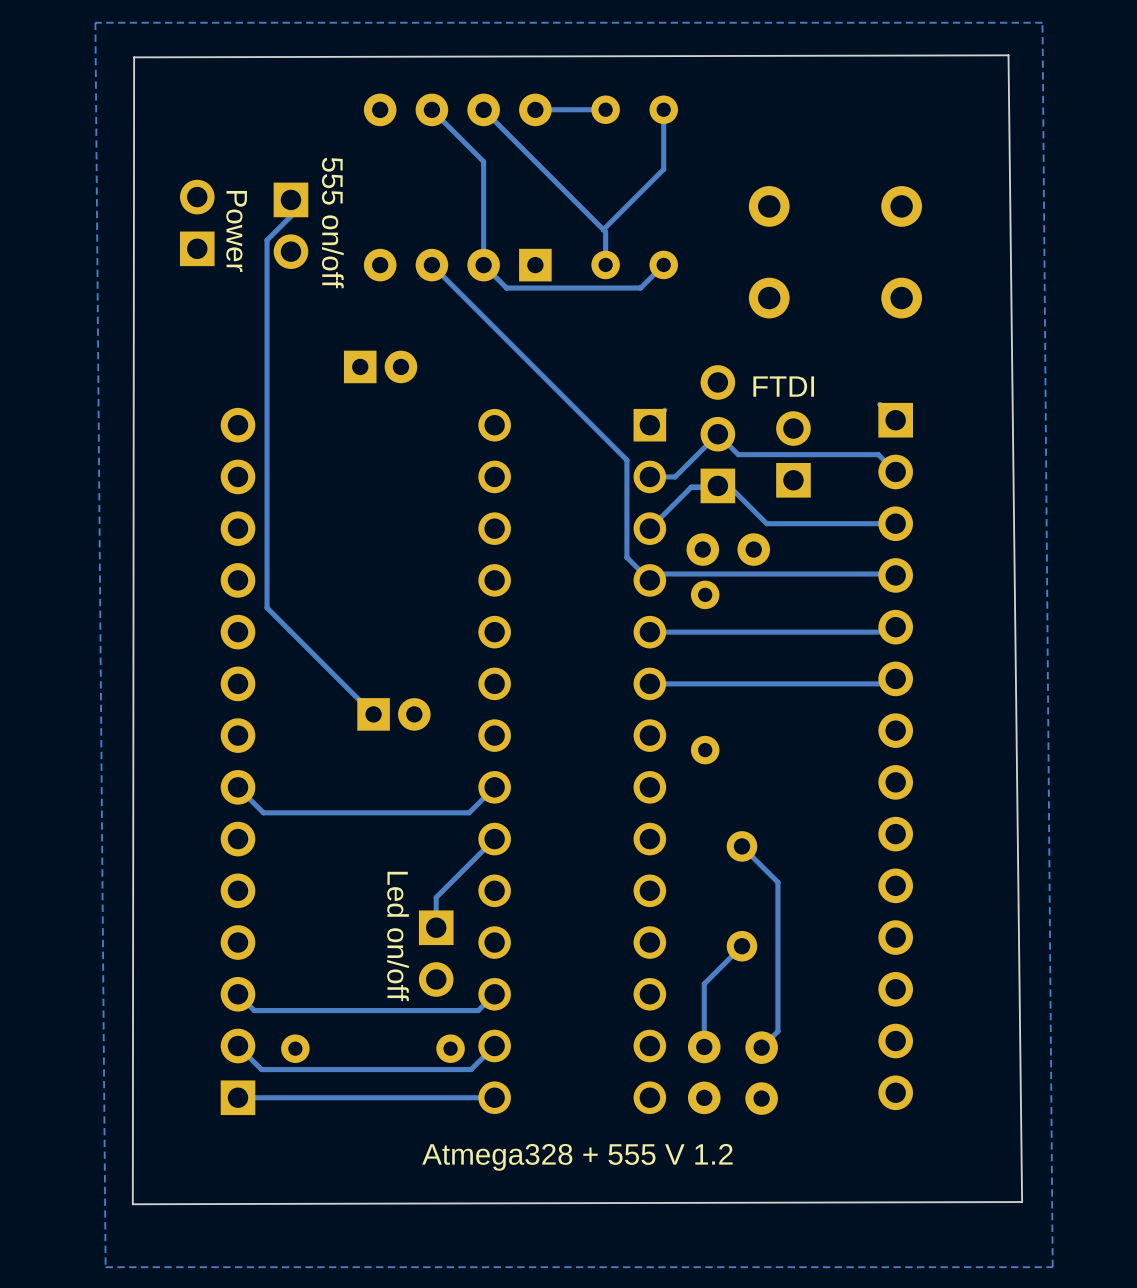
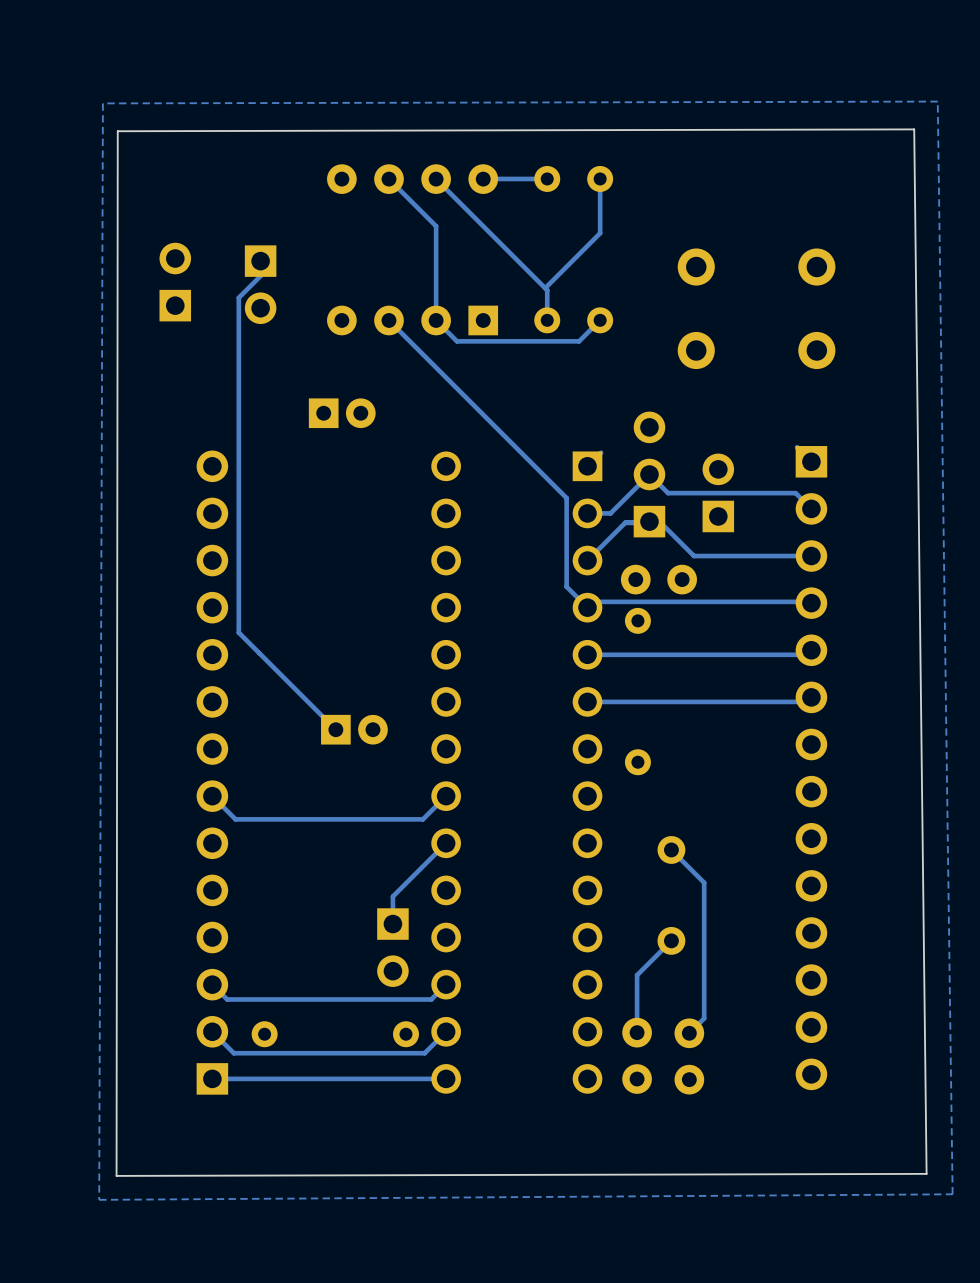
zone outline: (1042, 22) (1052, 1267) (105, 1267) (95, 22) (1042, 22) -> (937, 101) (952, 1194) (99, 1199) (102, 103) (937, 101)
text: 555 on/off (332, 222) -> none
text: Power (236, 231) -> none
text: FTDI (783, 386) -> none
text: Led on/off (398, 936) -> none
text: Atmega328 + 555 V 1.2 (577, 1157) -> none

